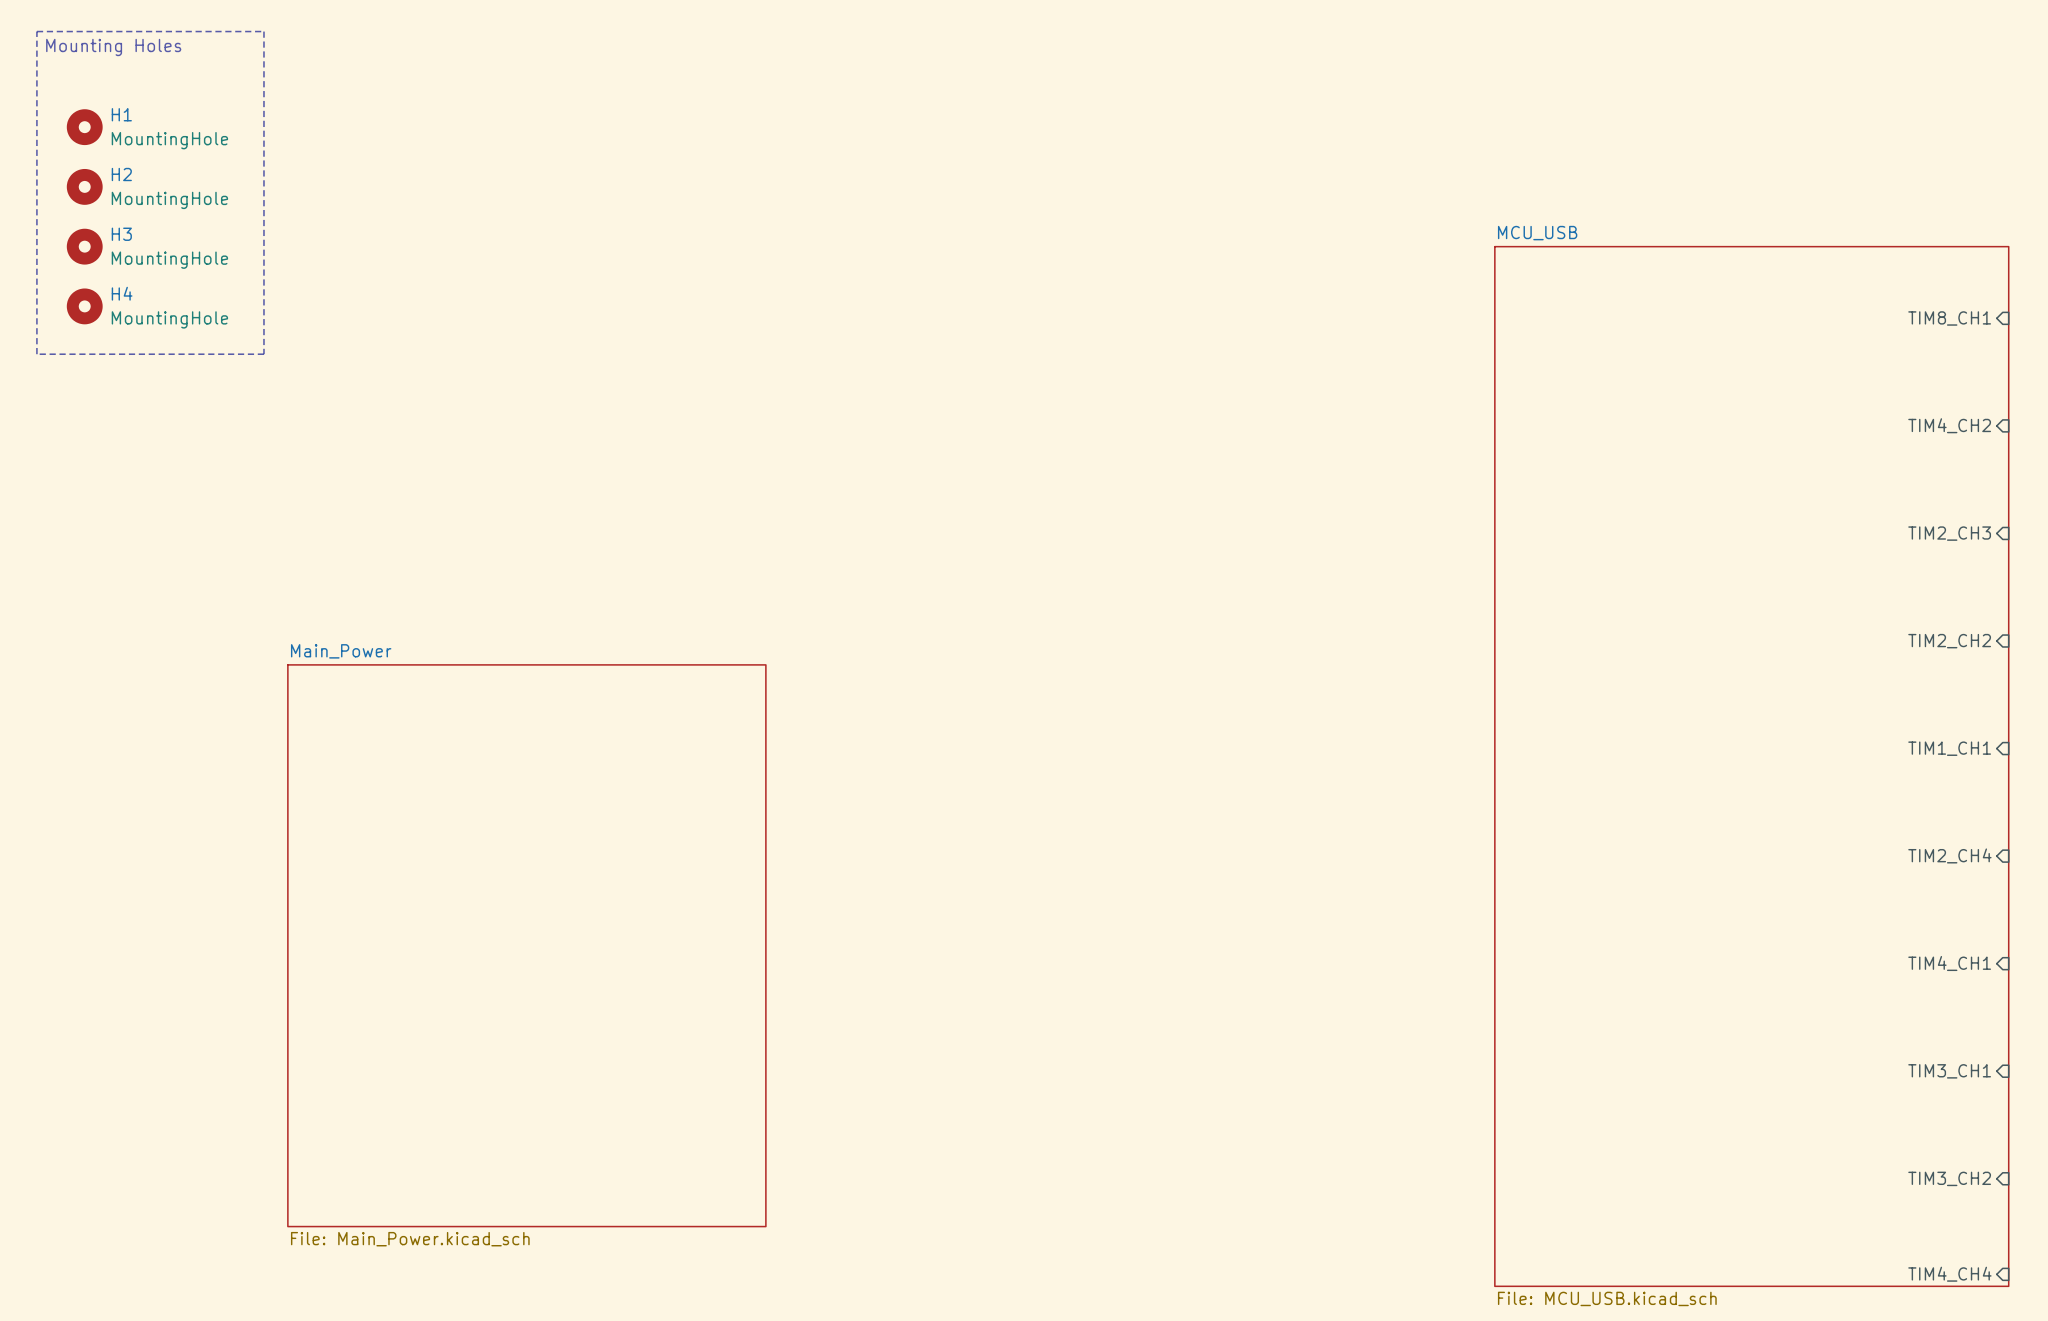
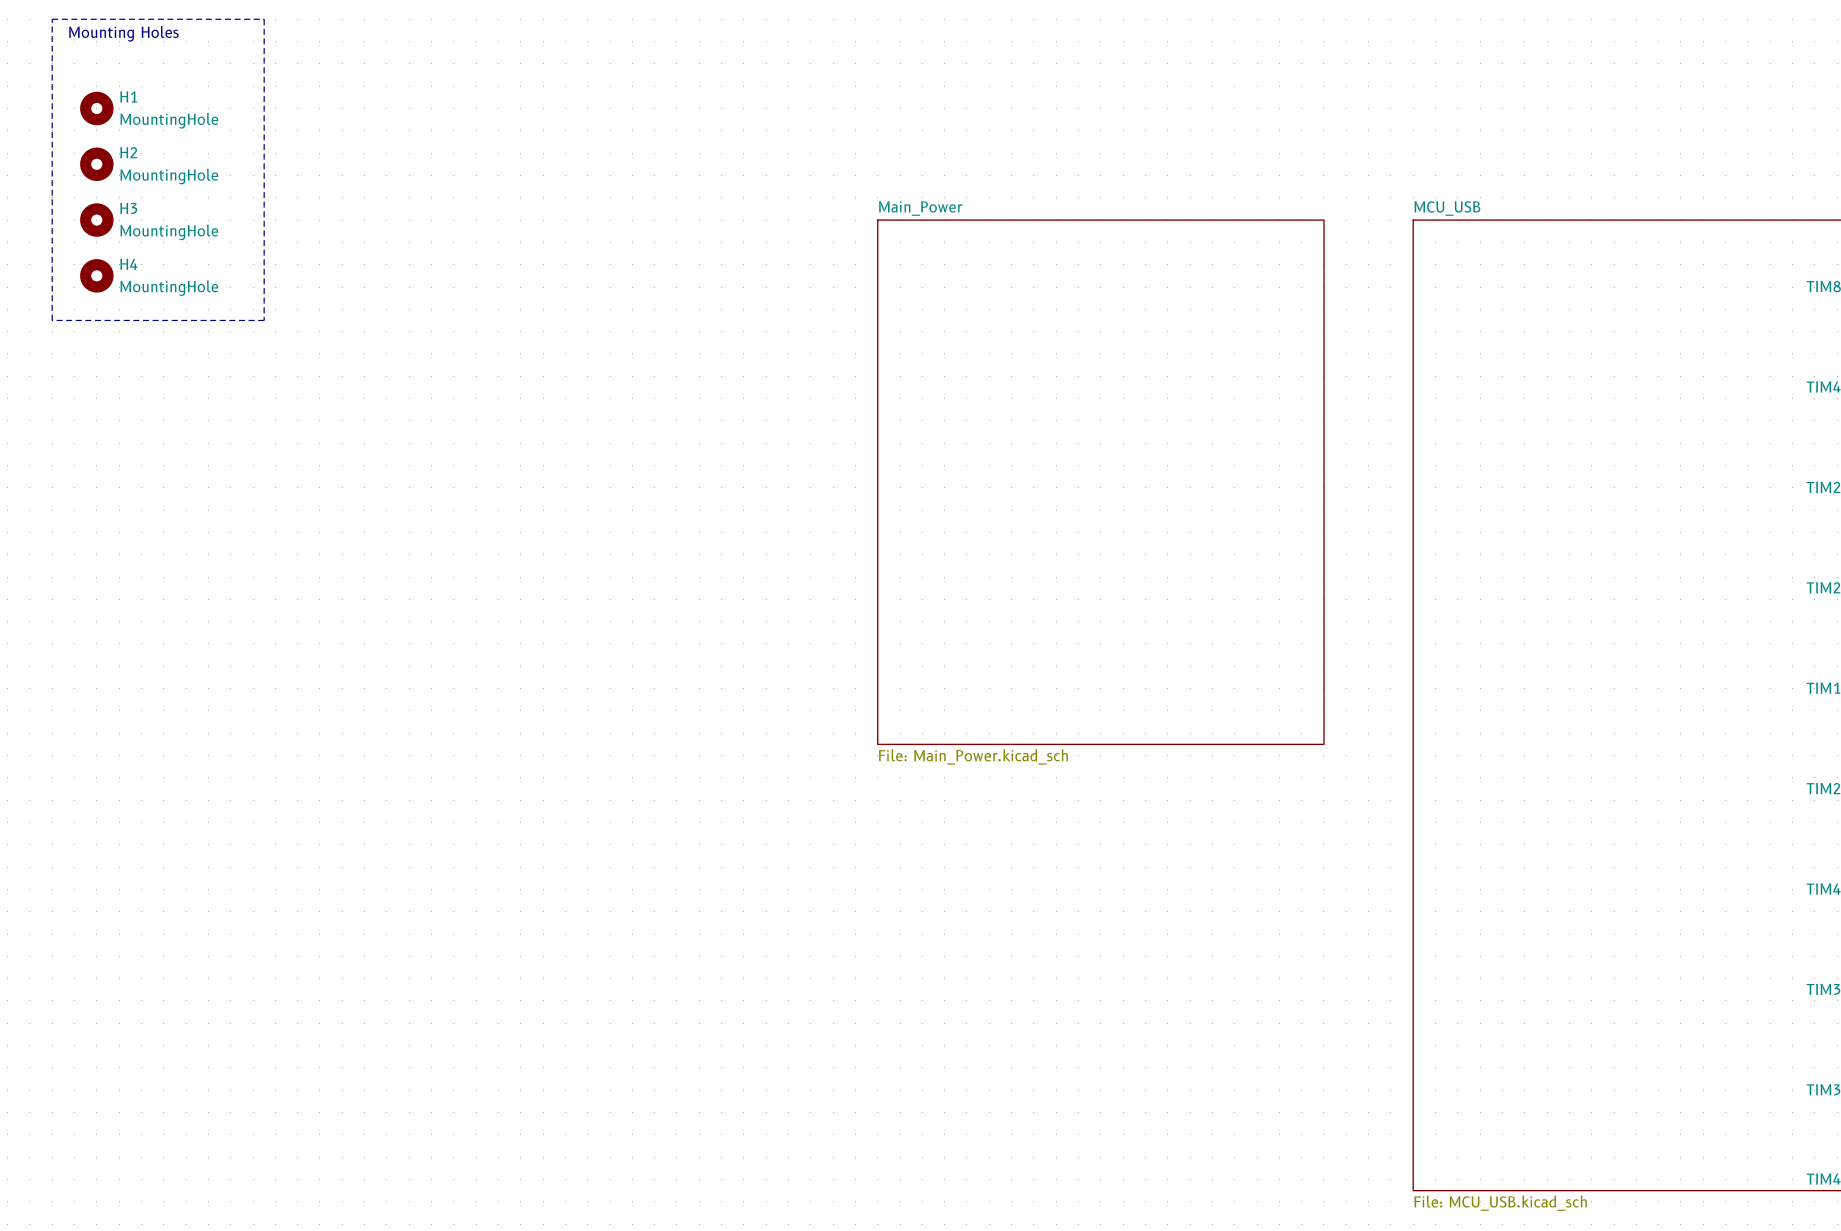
sheet Main_Power: none -> File: Main_Power.kicad_sch (1100, 482)
sheet Main_Power: File: Main_Power.kicad_sch (526, 945) -> none

